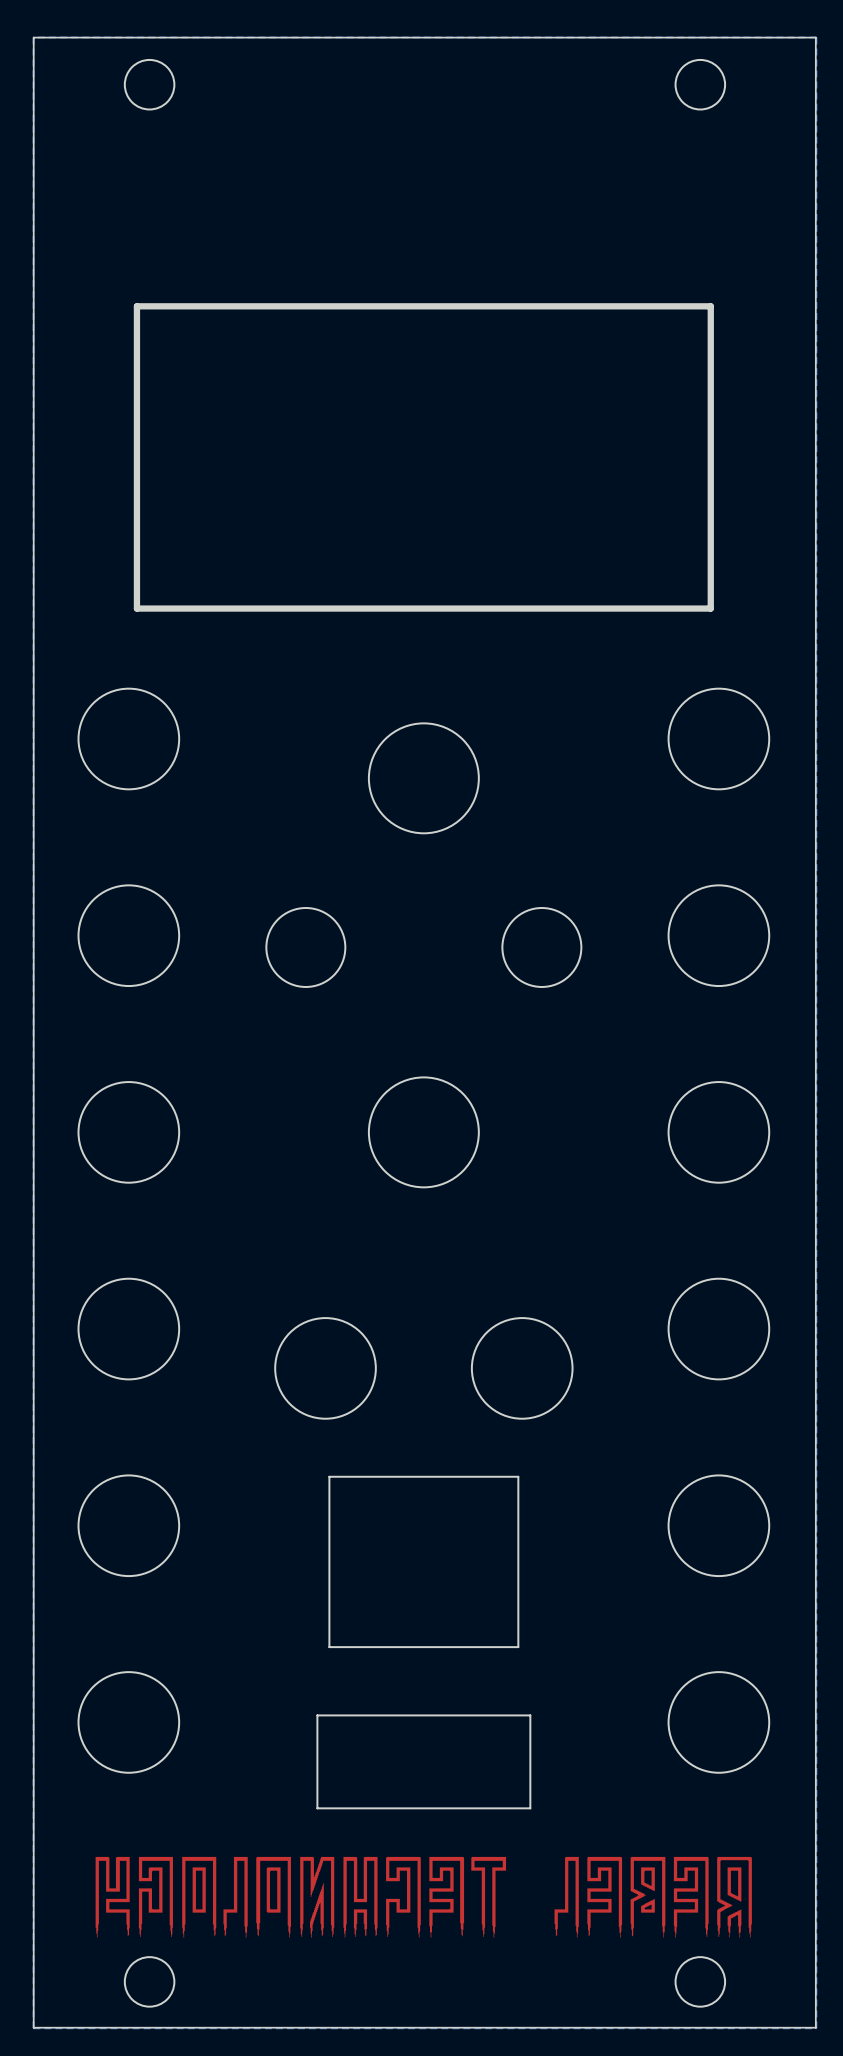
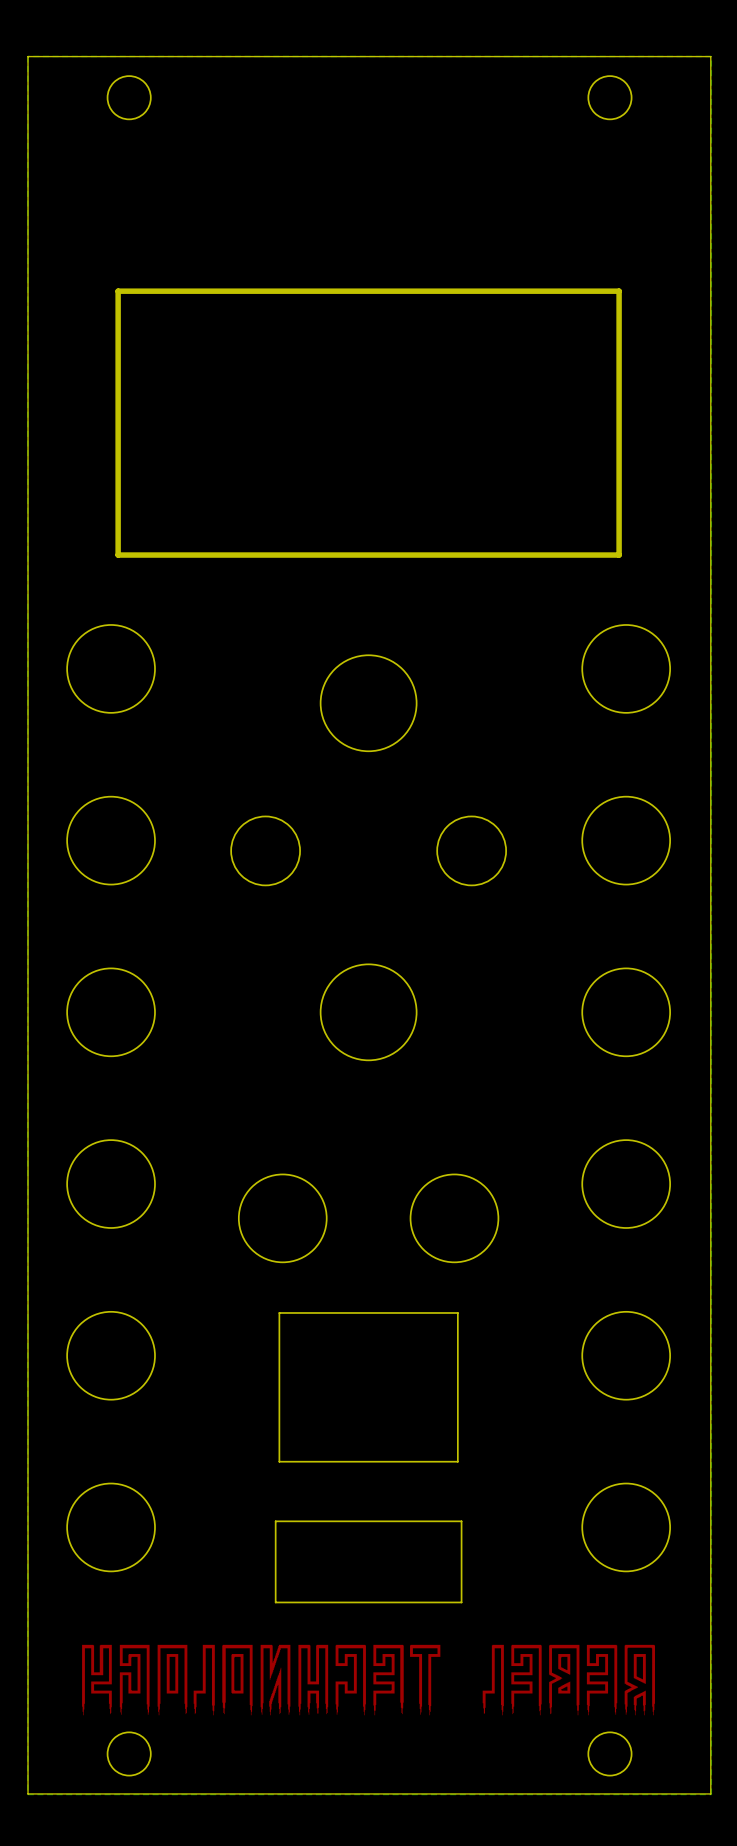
drawing shape: [328, 1475, 520, 1649] -> [278, 1312, 459, 1463]

